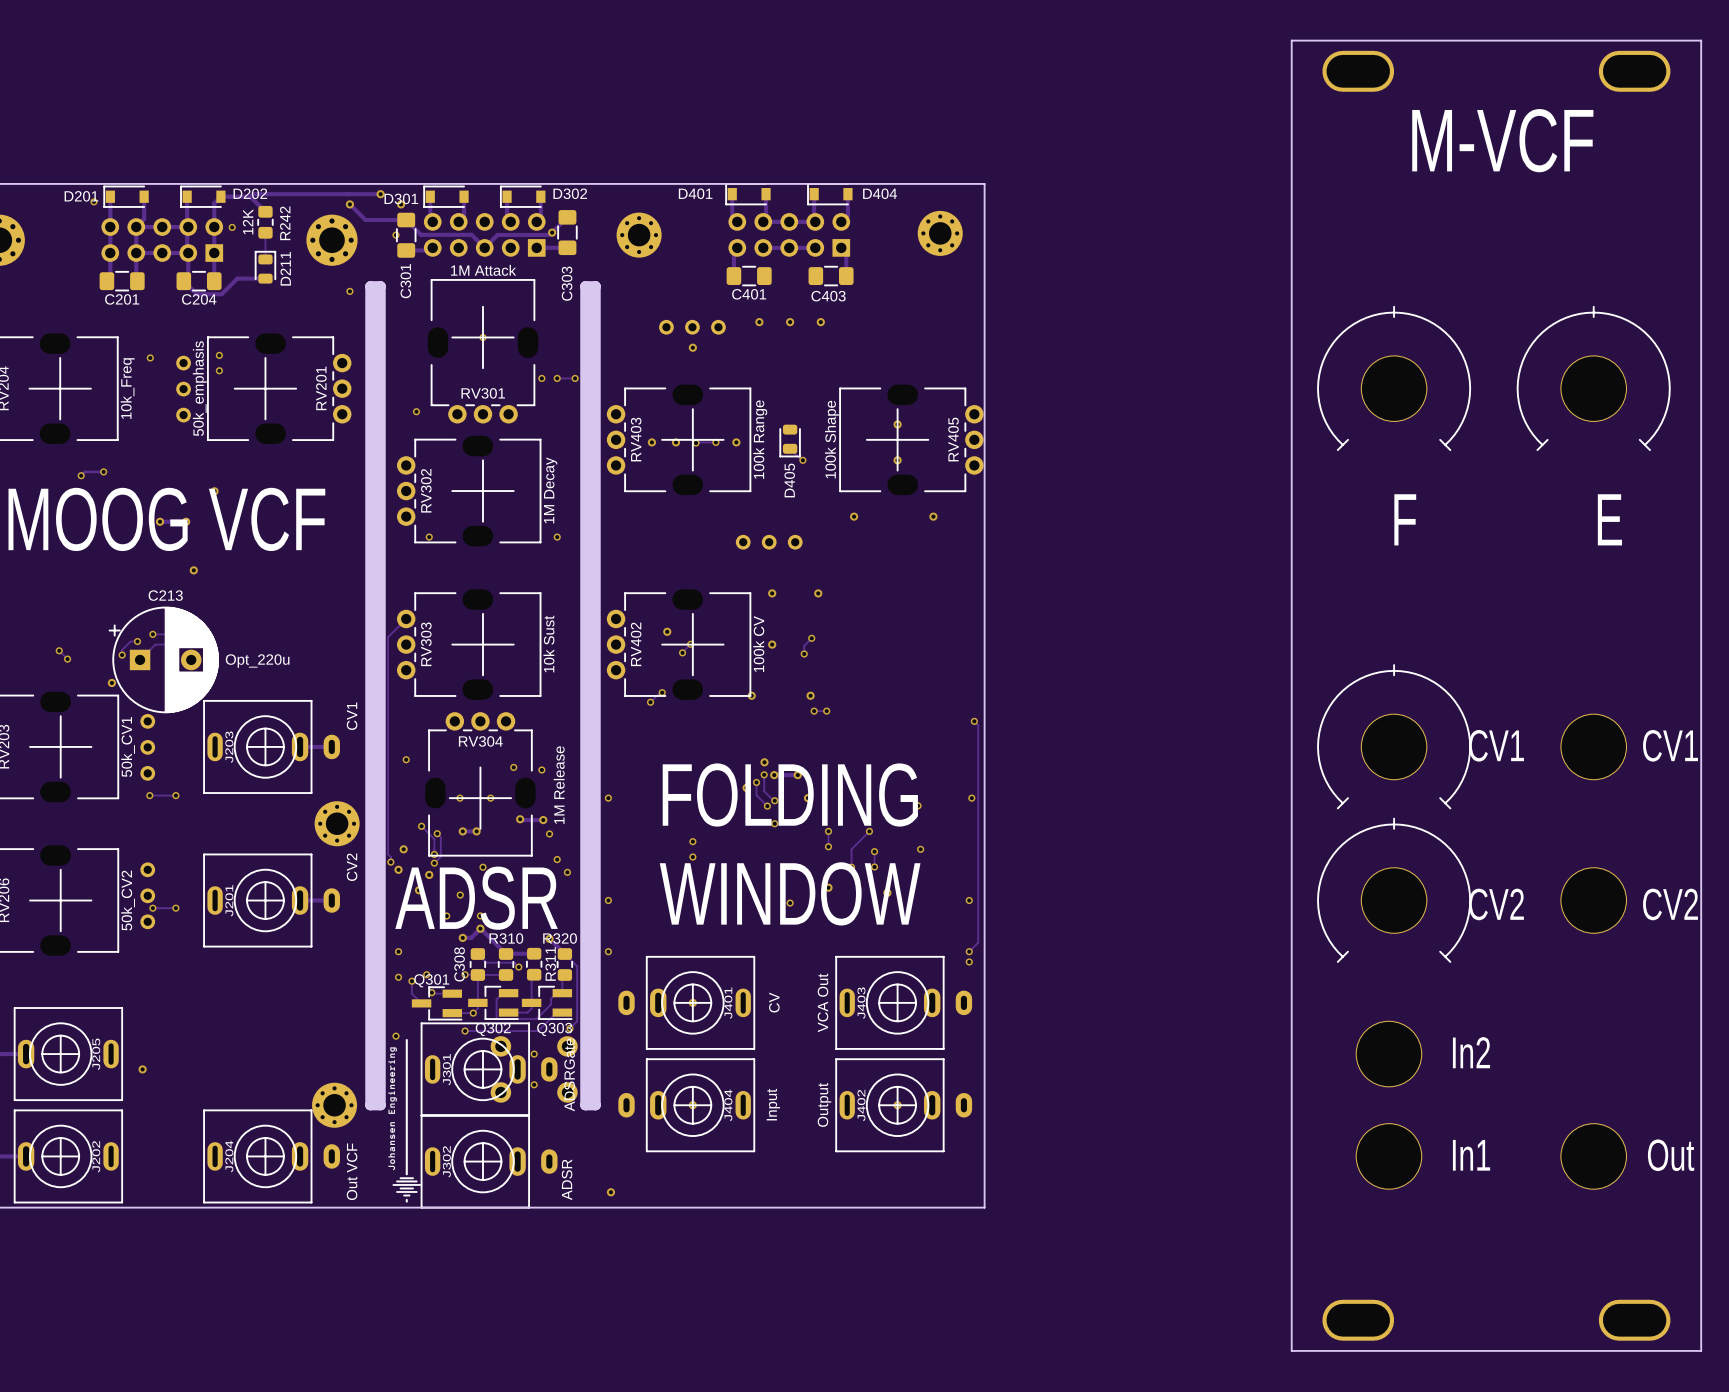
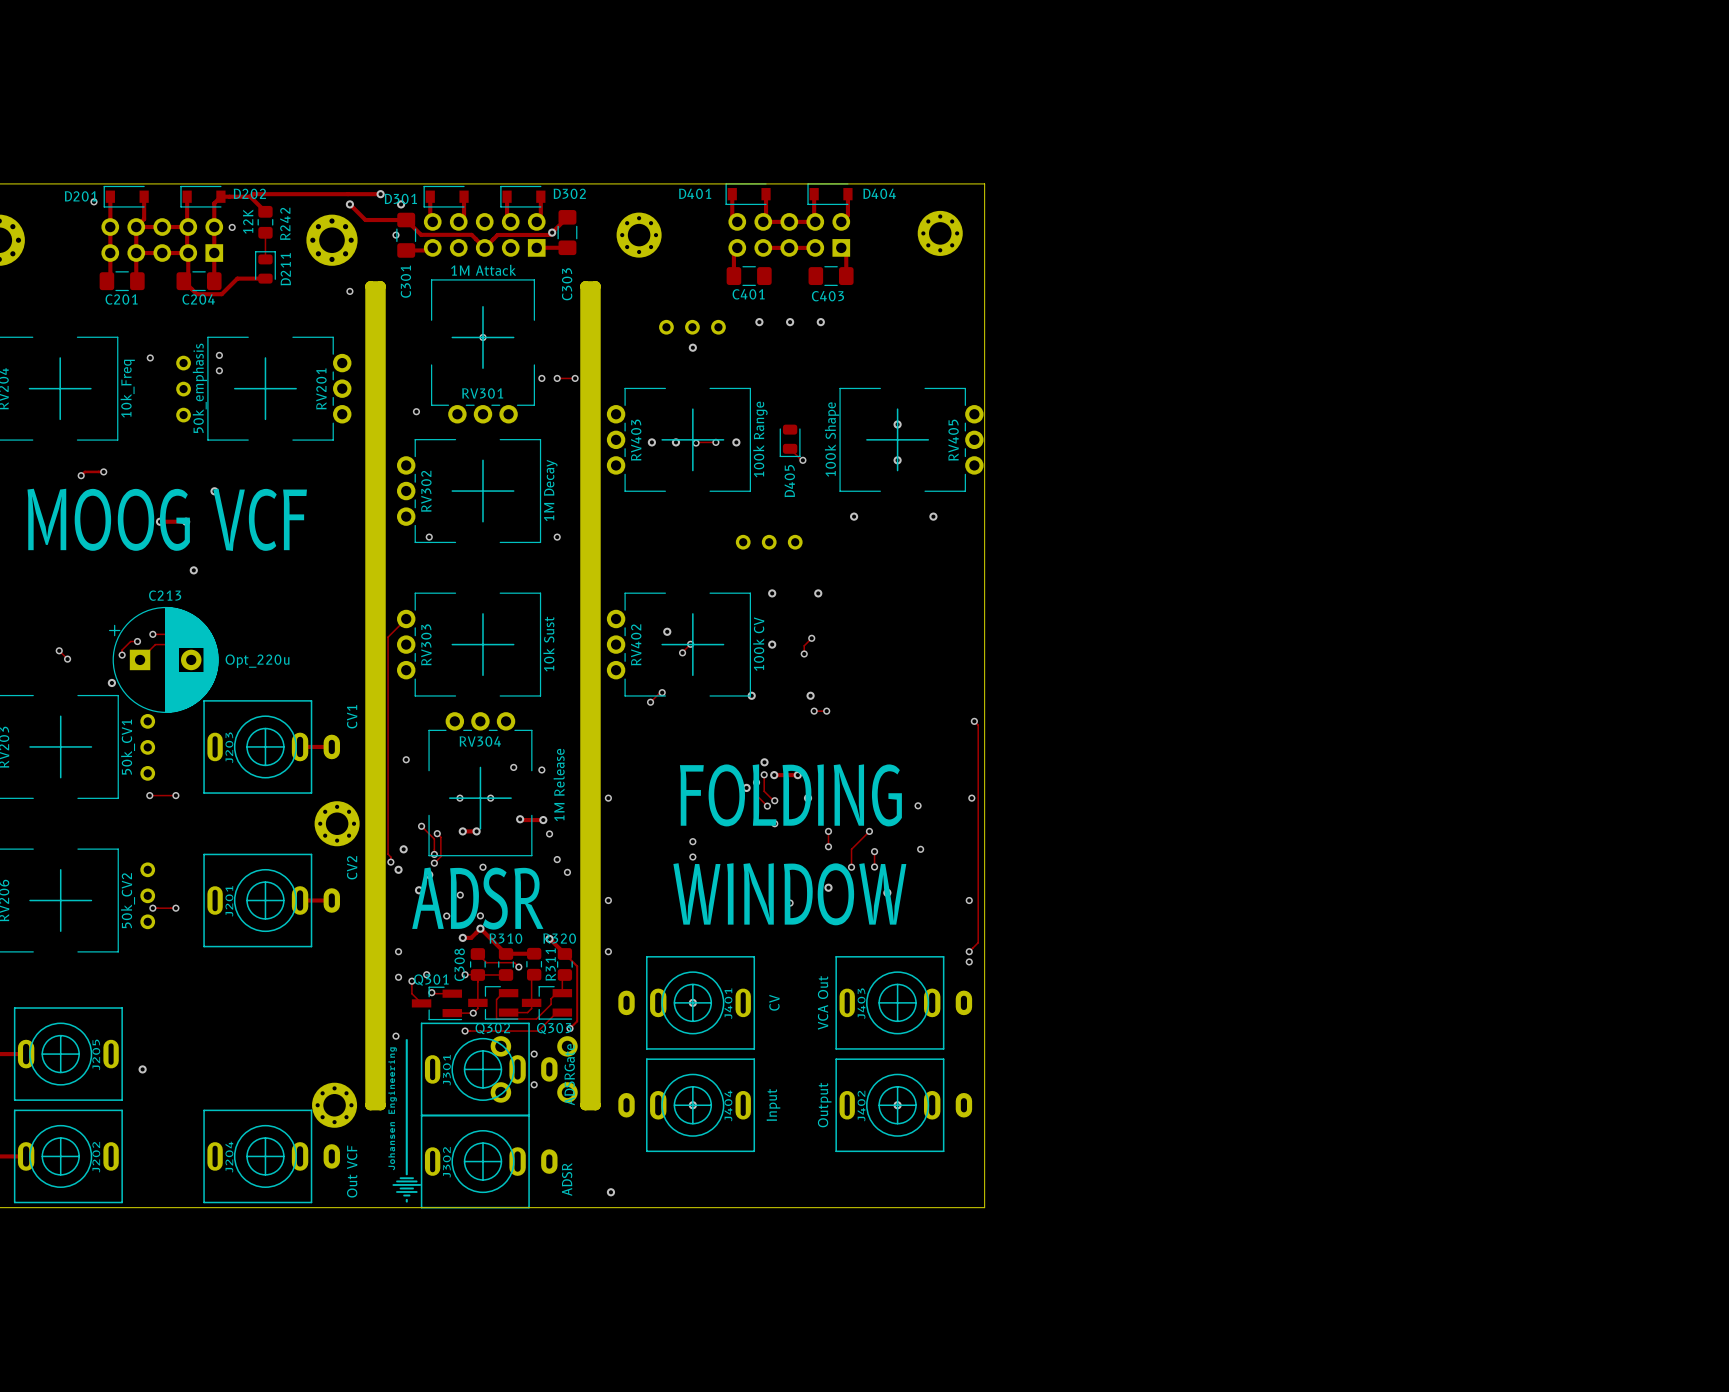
board edge: (1291, 40) (1291, 1350) (1701, 1350) (1701, 40) (1291, 40) -> none
part: (1358, 71) -> none
part: (1634, 71) -> none
text: M-VCF (1502, 140) -> none
part: (1394, 378) -> none
part: (1593, 378) -> none
text: F (1405, 519) -> none
text: E (1609, 519) -> none
part: (1394, 736) -> none
text: CV1 (1496, 745) -> none
text: CV1 (1670, 745) -> none
part: (1593, 746) -> none
part: (1394, 890) -> none
part: (1593, 900) -> none
text: CV2 (1496, 904) -> none
text: CV2 (1670, 904) -> none
text: In2 (1471, 1052) -> none
part: (1388, 1054) -> none
text: In1 (1471, 1155) -> none
text: Out (1671, 1155) -> none
part: (1388, 1156) -> none
part: (1593, 1156) -> none
part: (1358, 1320) -> none
part: (1634, 1320) -> none

